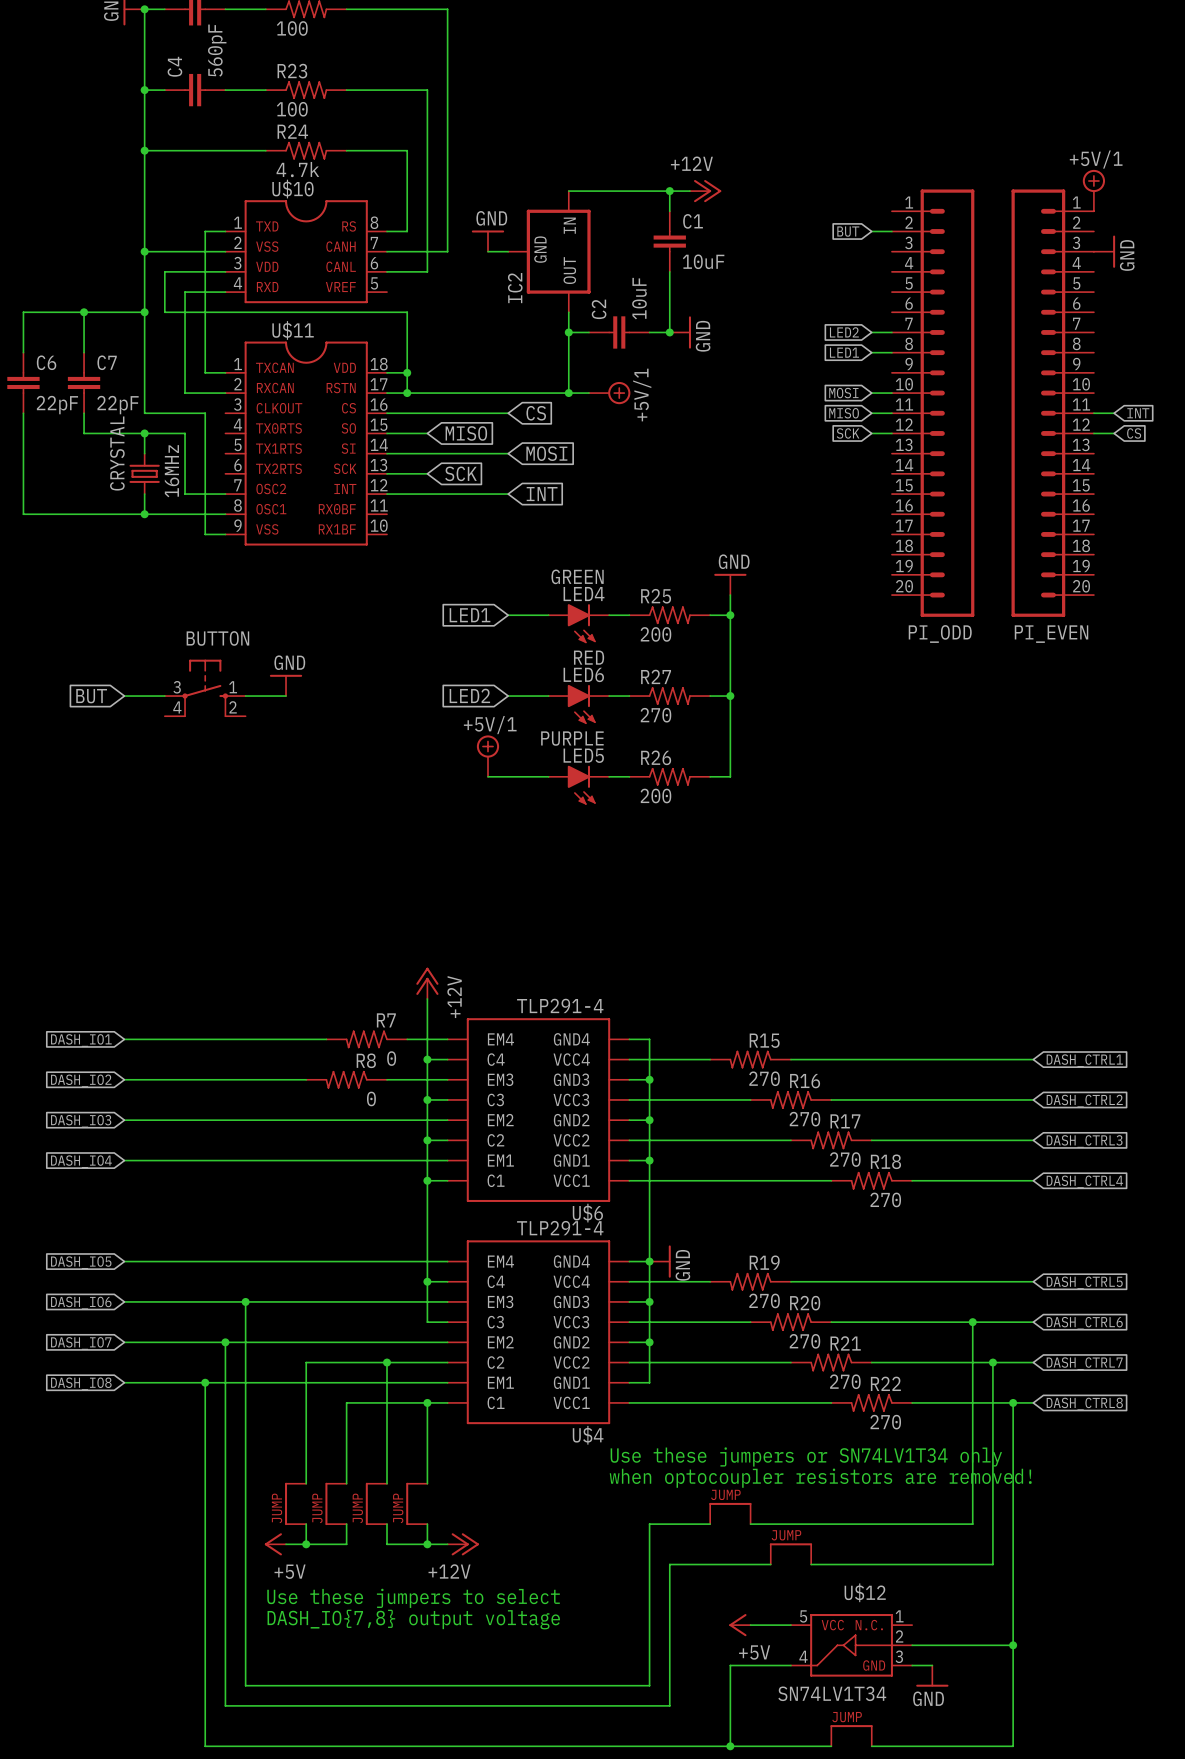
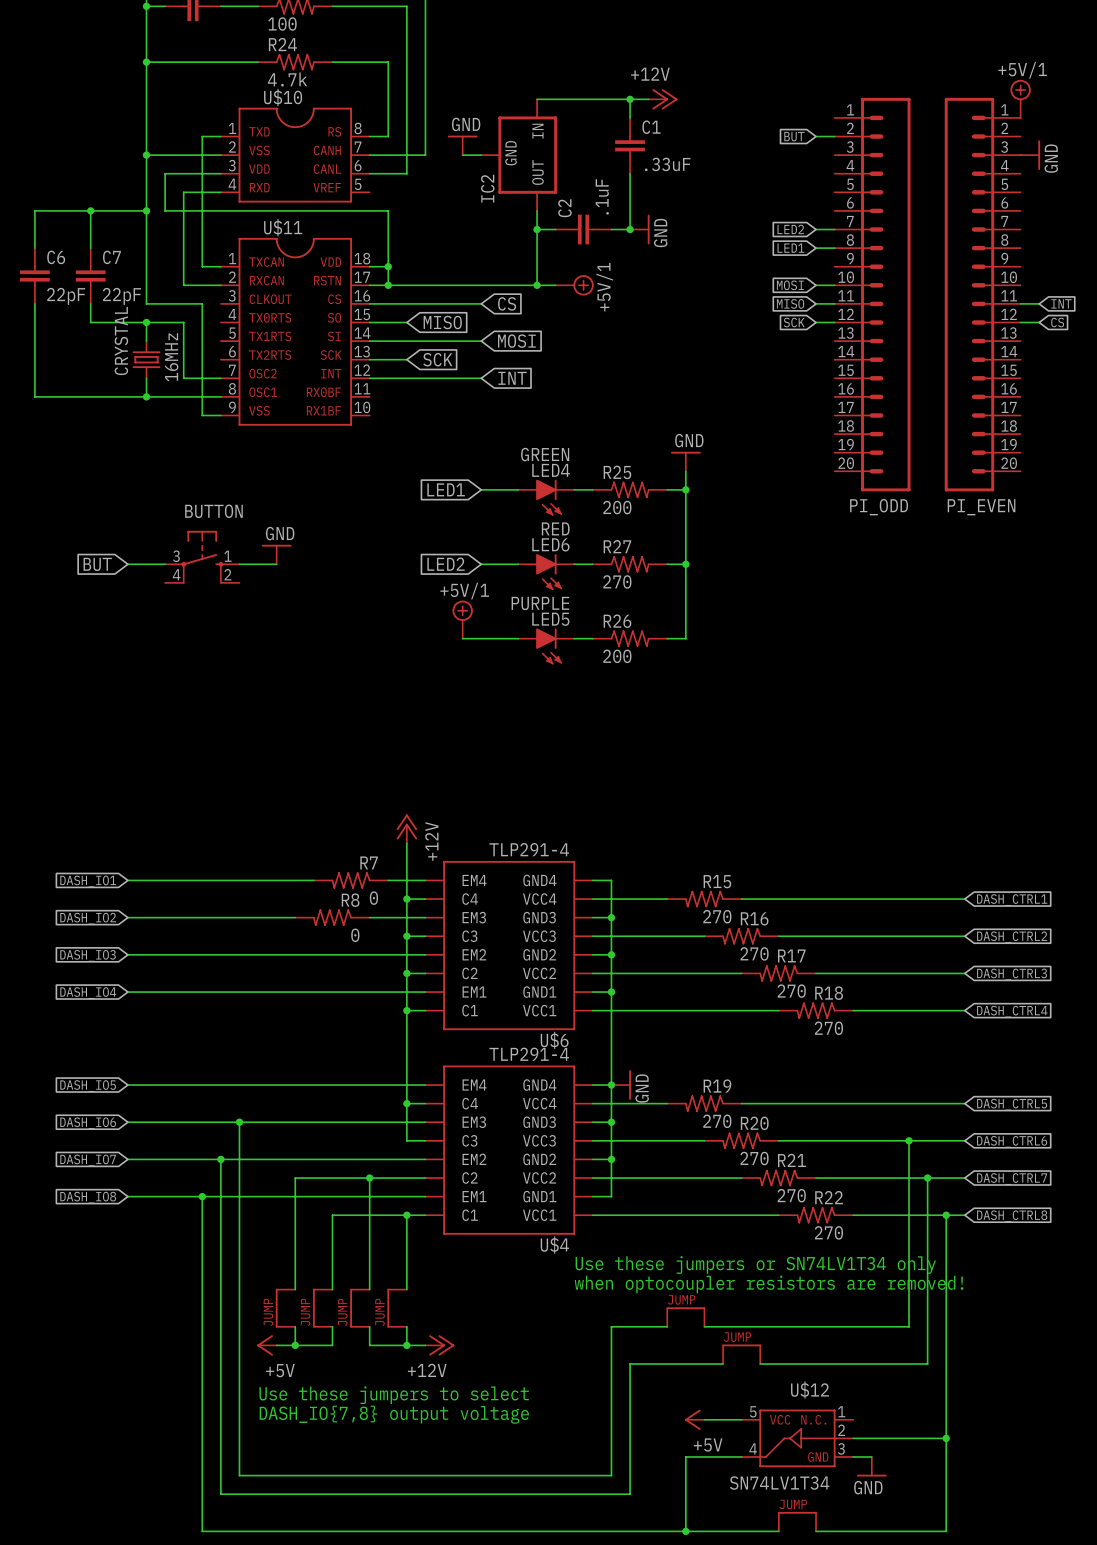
C1 value: 10uF (703, 261) -> .33uF (667, 164)
C2 value: 10uF (639, 298) -> .1uF (602, 196)

